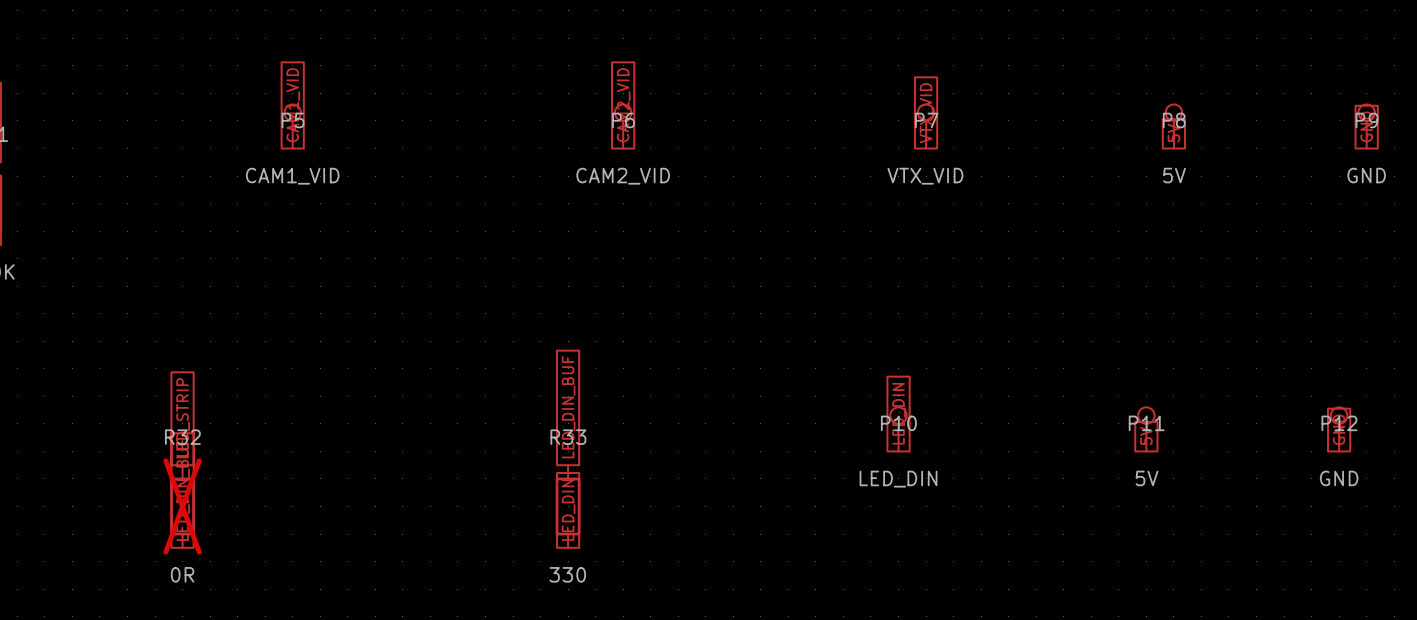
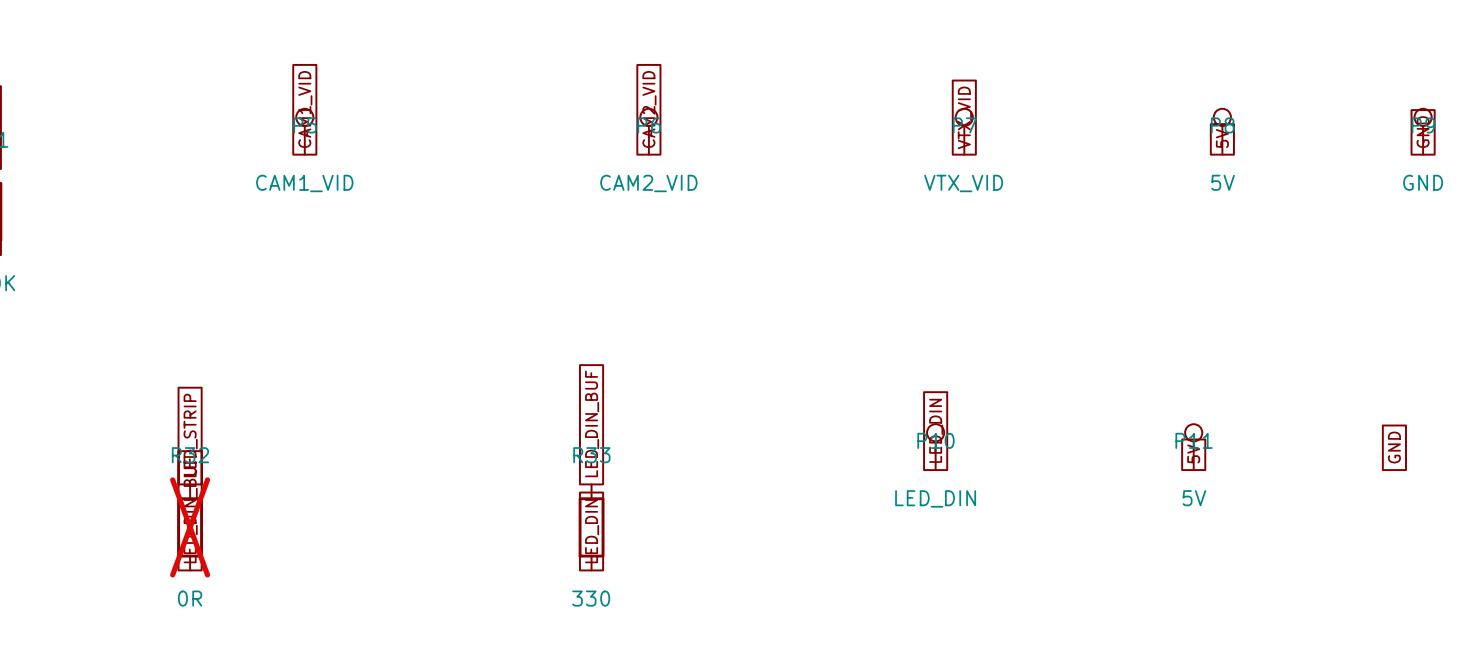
P12: GND (1339, 429) -> none

